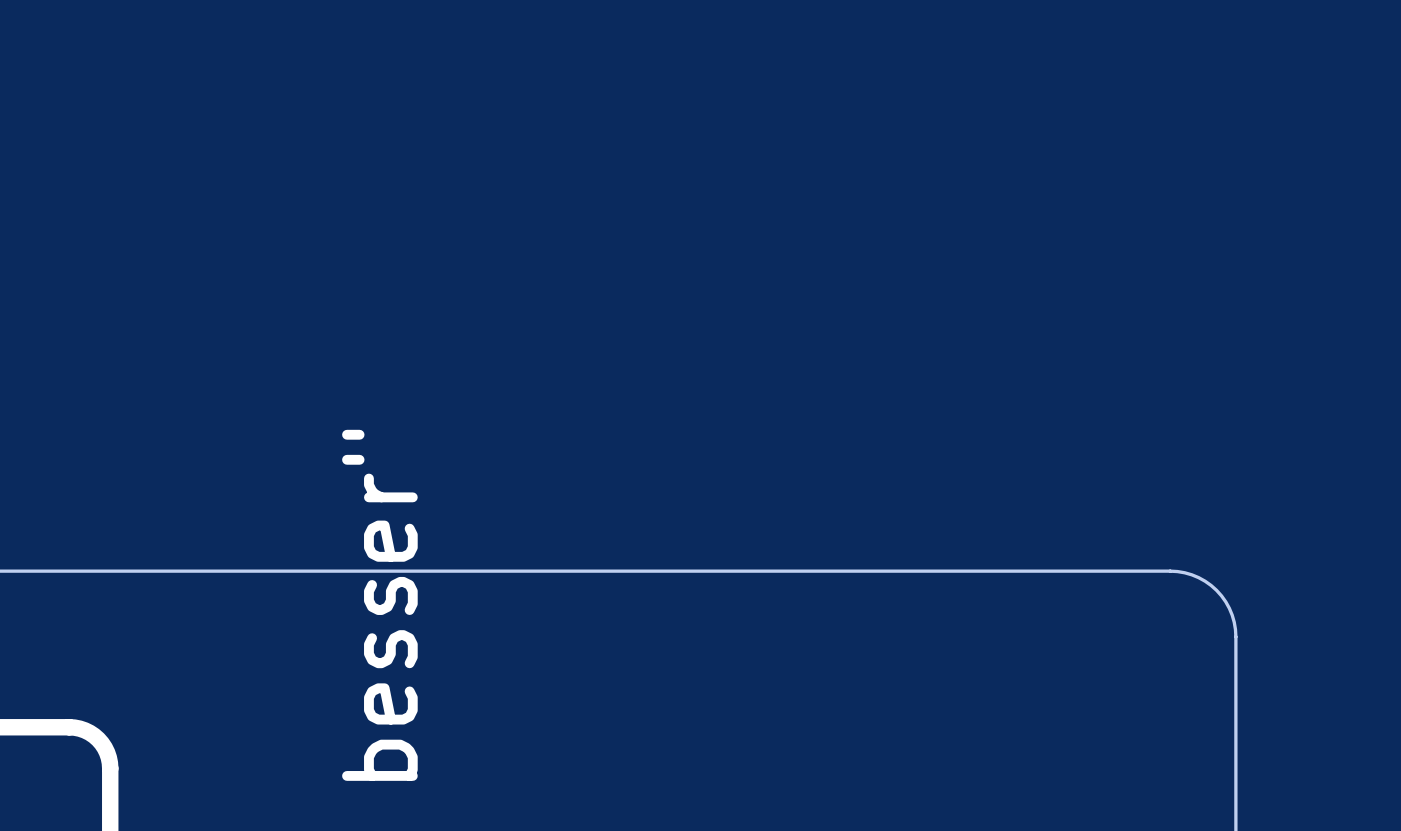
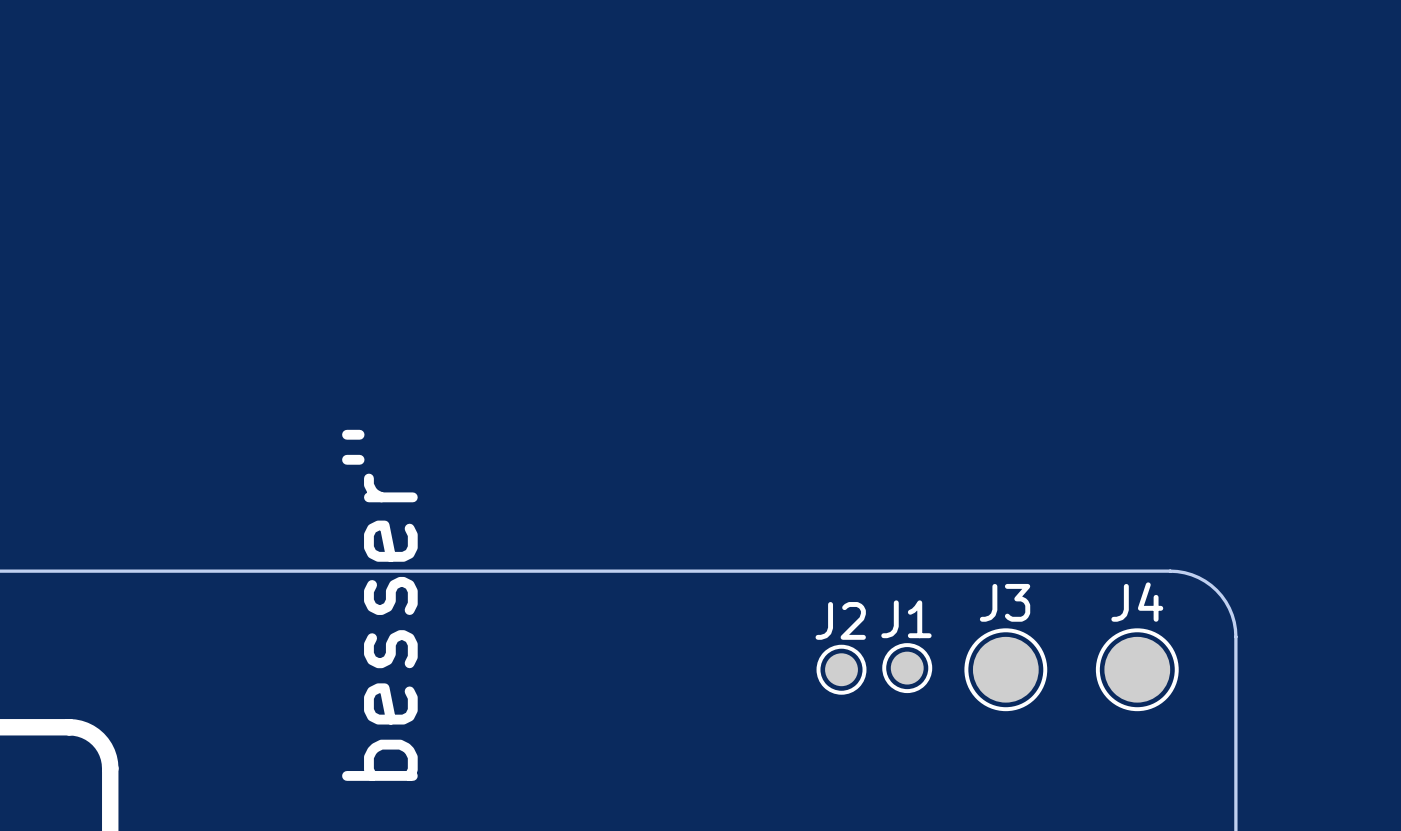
J1: none -> (907, 668)
J2: none -> (841, 669)
J3: none -> (1005, 669)
J4: none -> (1137, 669)

